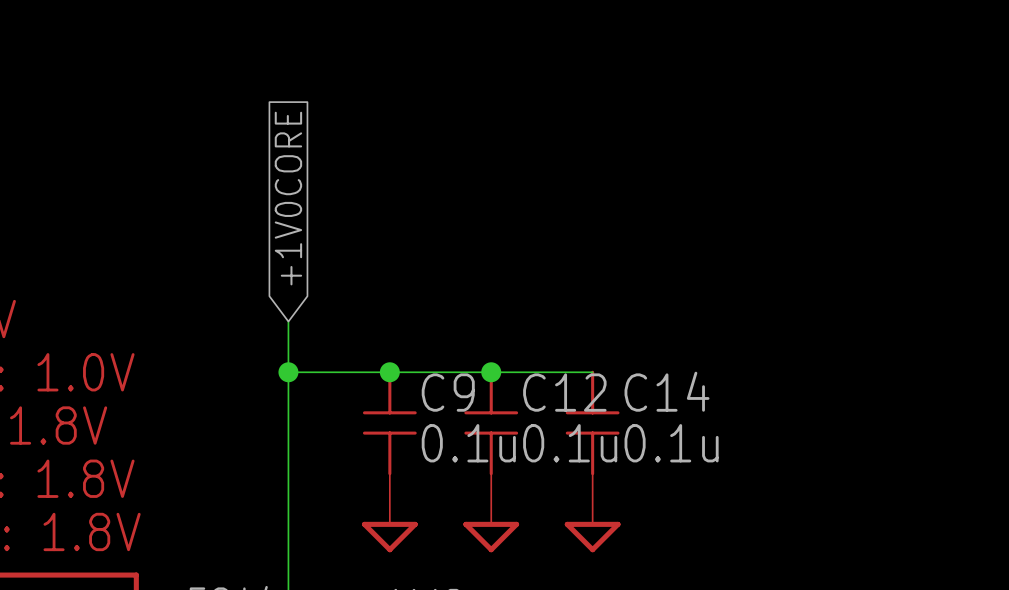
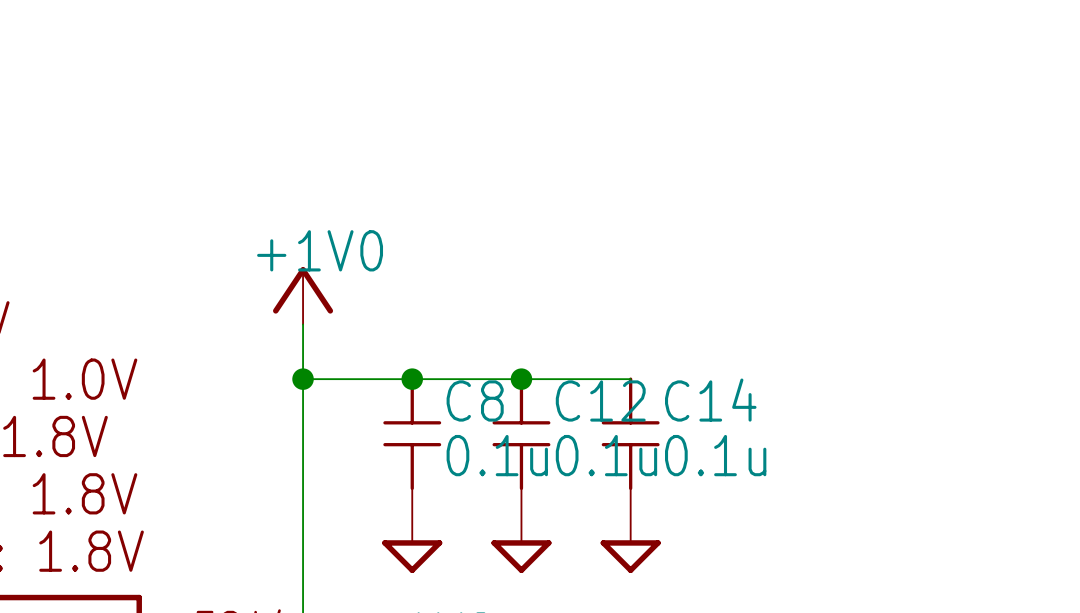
global label: +1V0CORE (288, 198) -> none
power symbol: none -> +1V0 (303, 295)
C9 name: C9 (448, 392) -> C8 (475, 400)

